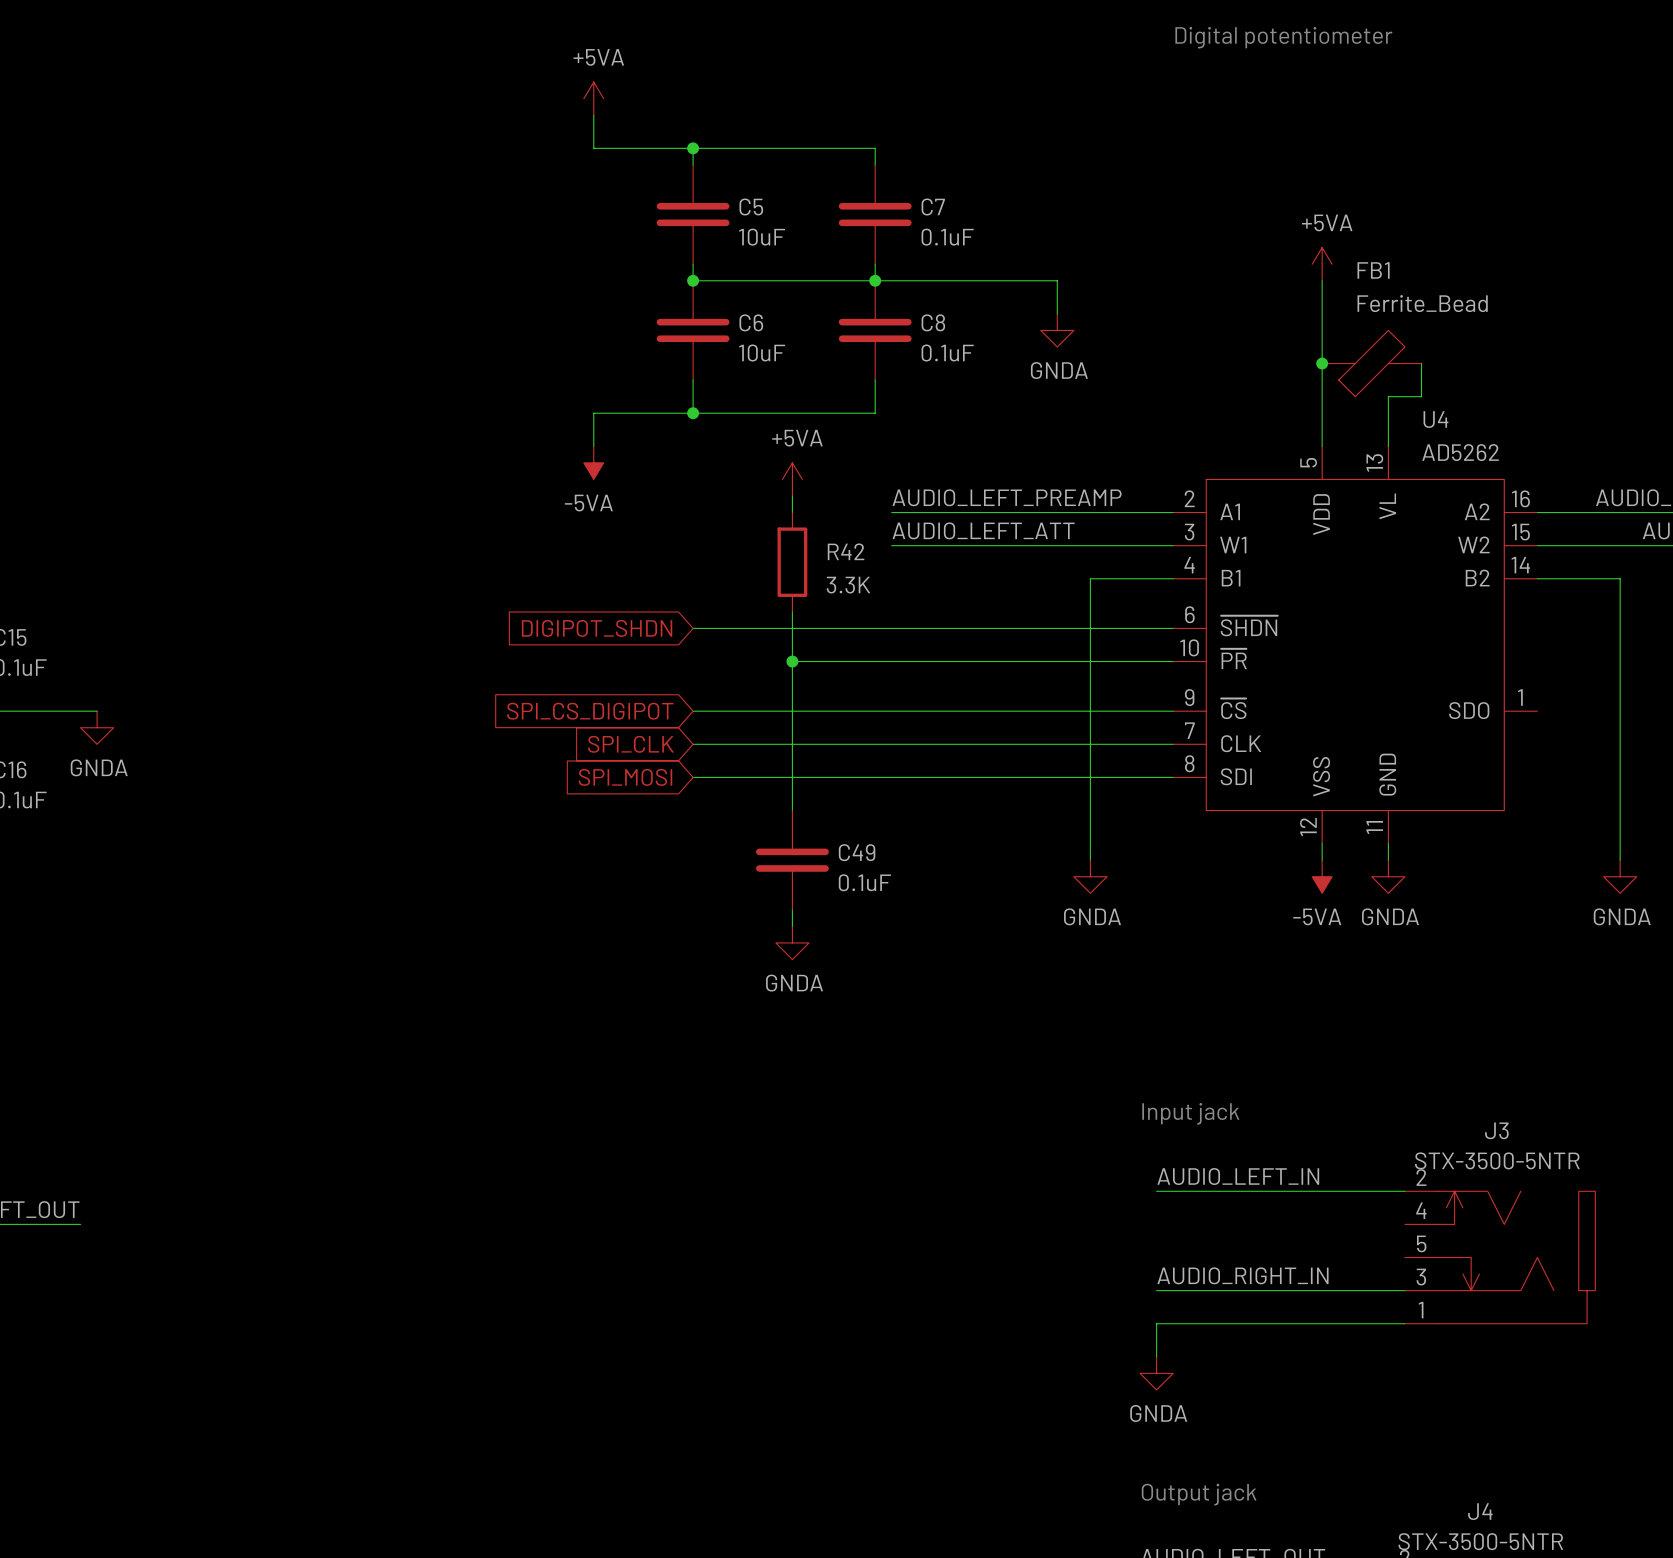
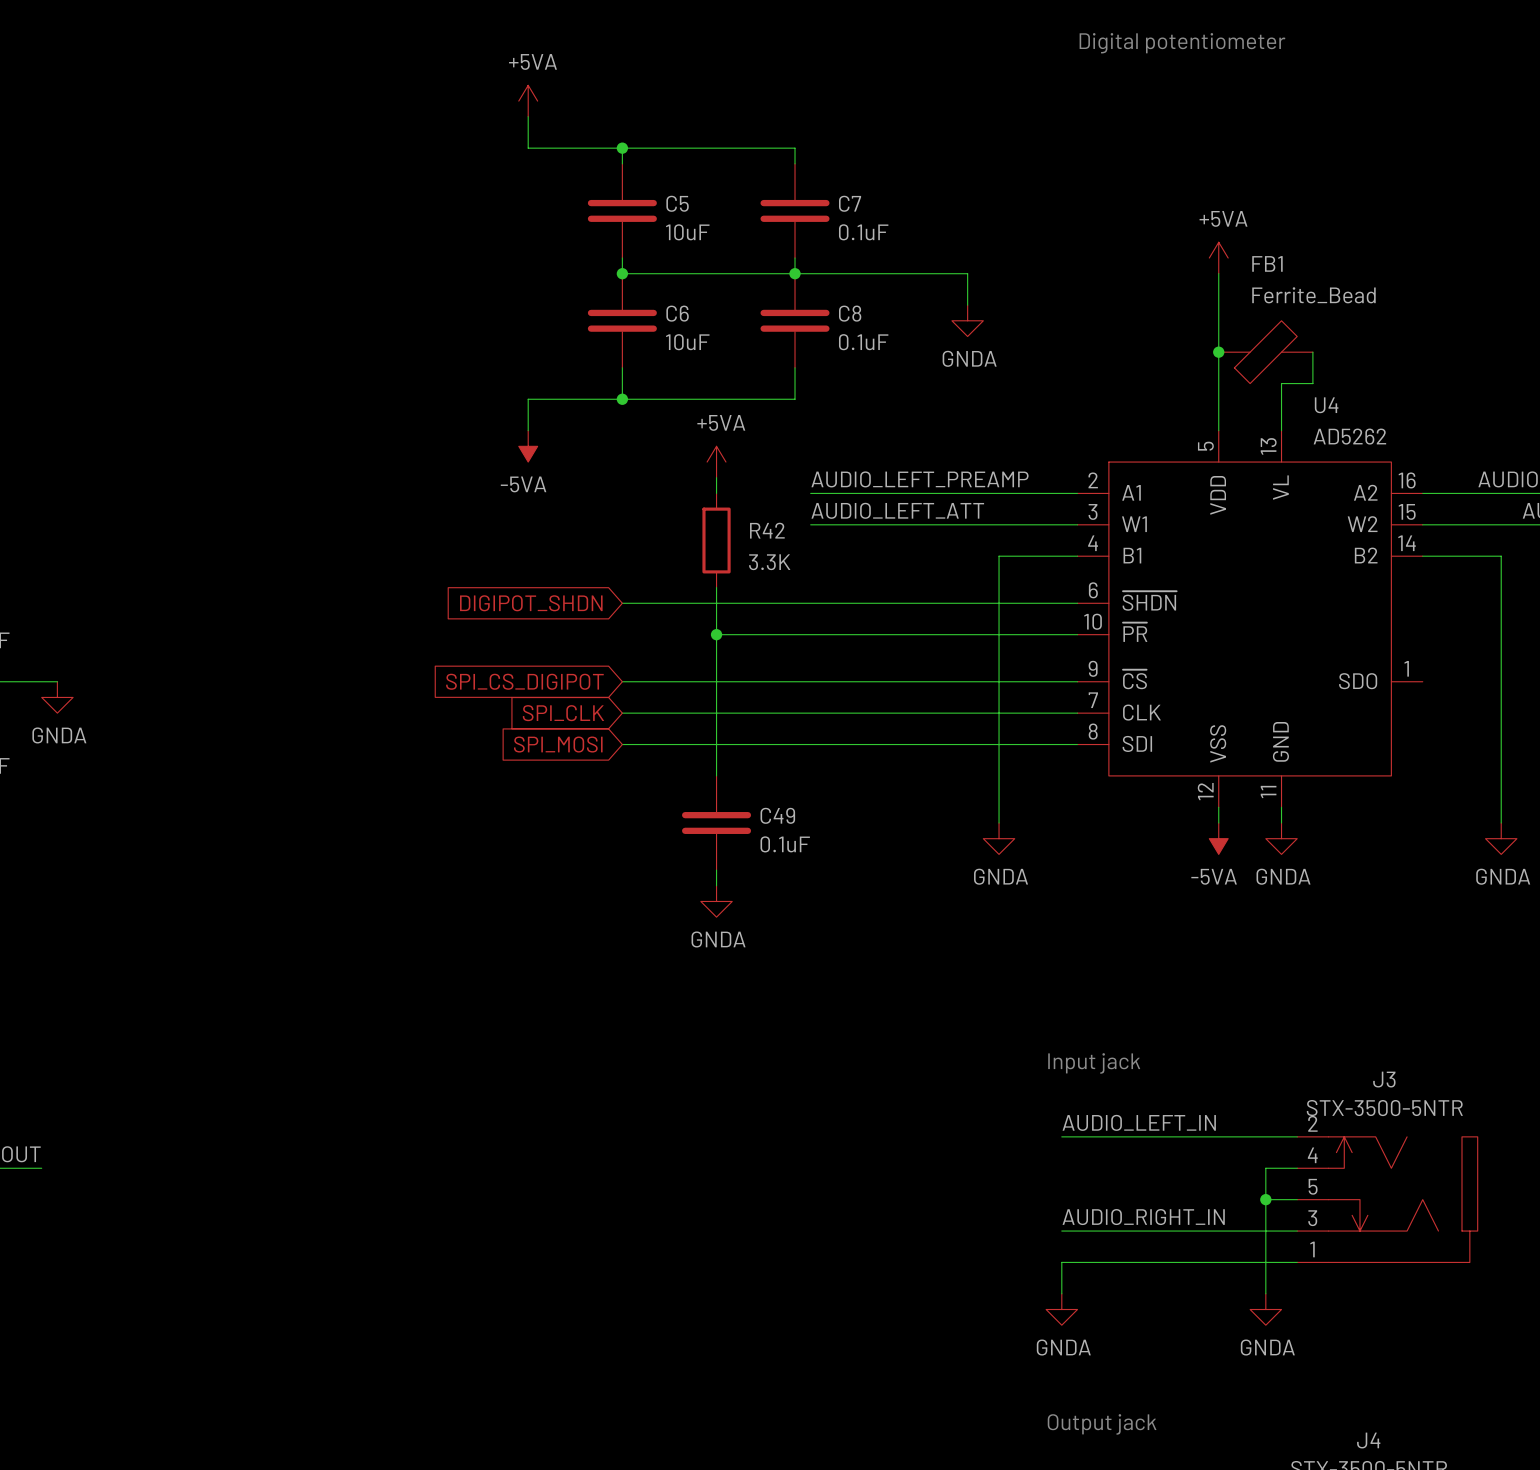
wire: none -> (1297, 1168) (1265, 1168) (1265, 1293)
wire: none -> (1265, 1199) (1297, 1199)
junction: none -> (1265, 1199)
power symbol: none -> GNDA (1265, 1309)

